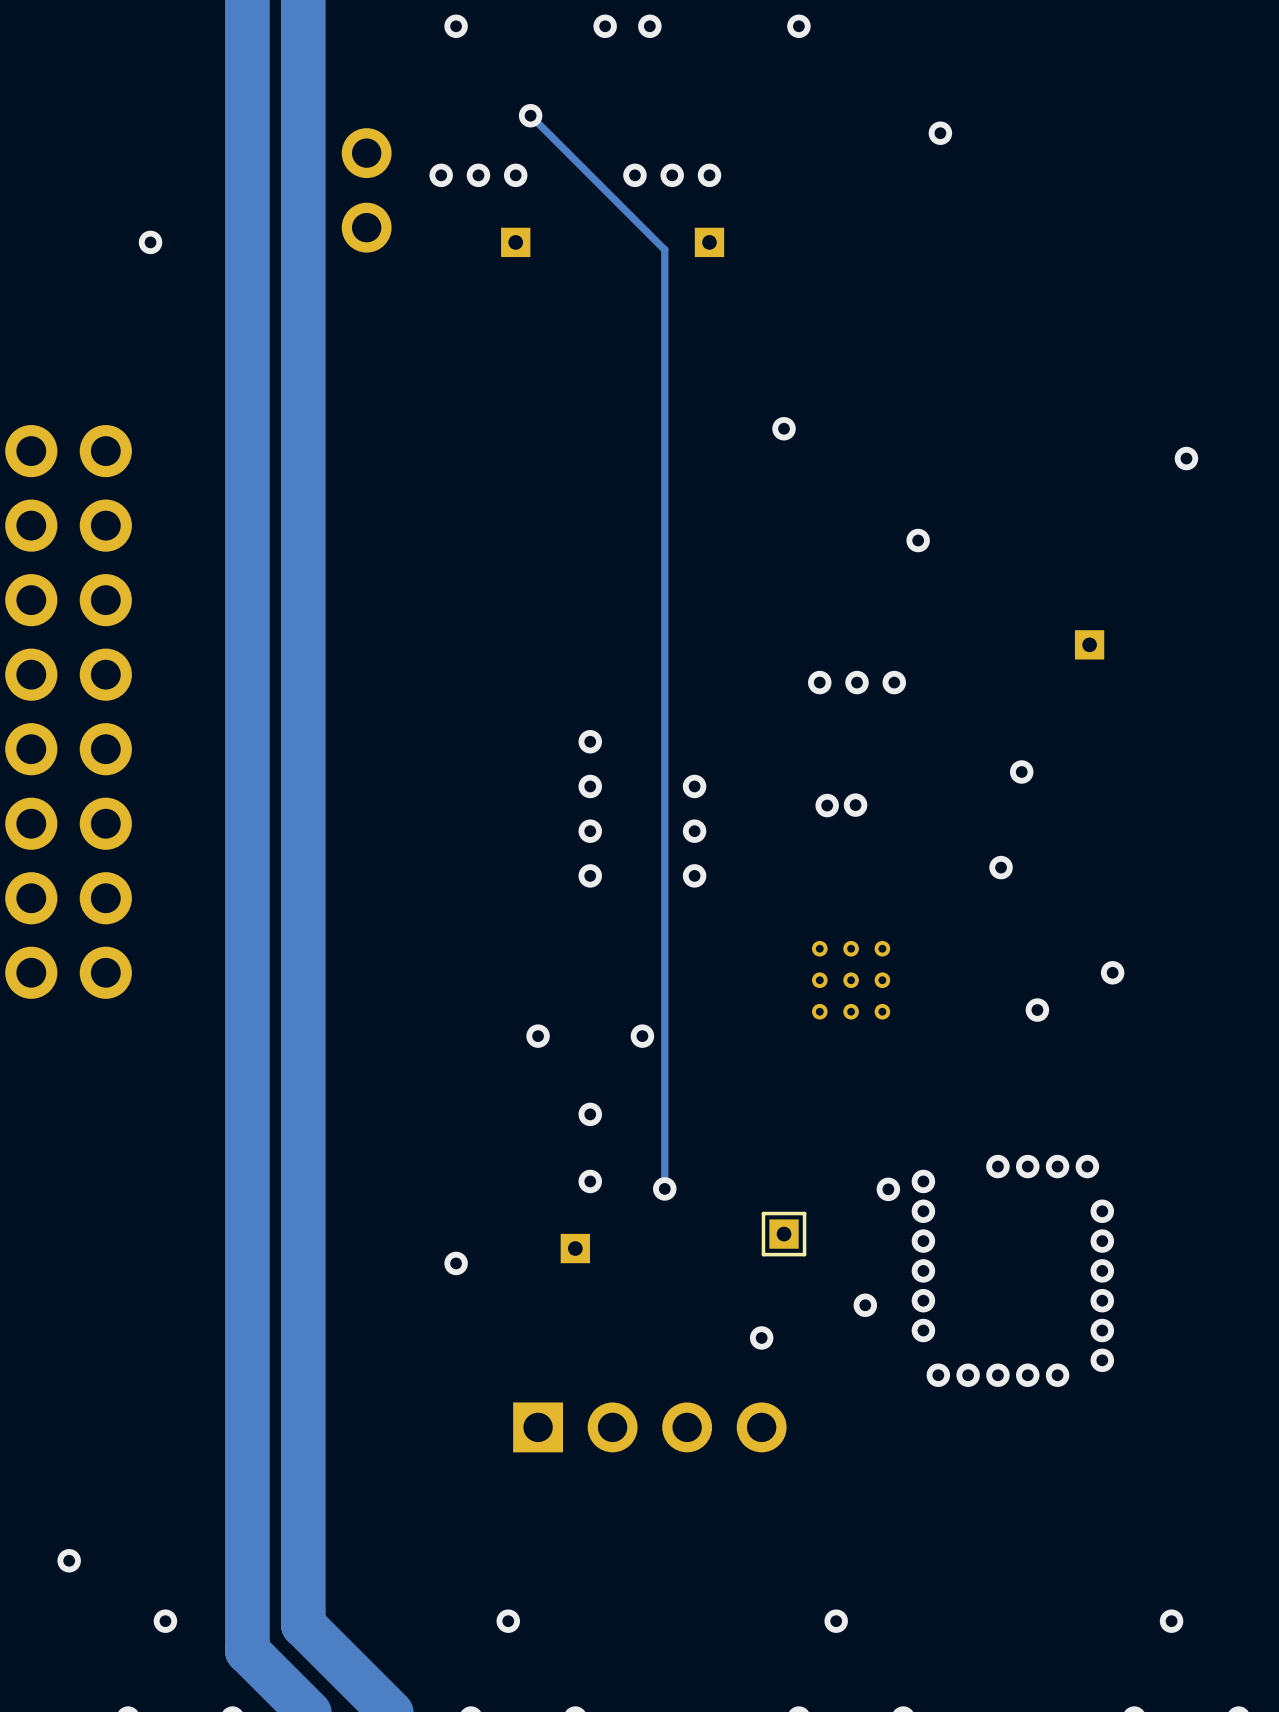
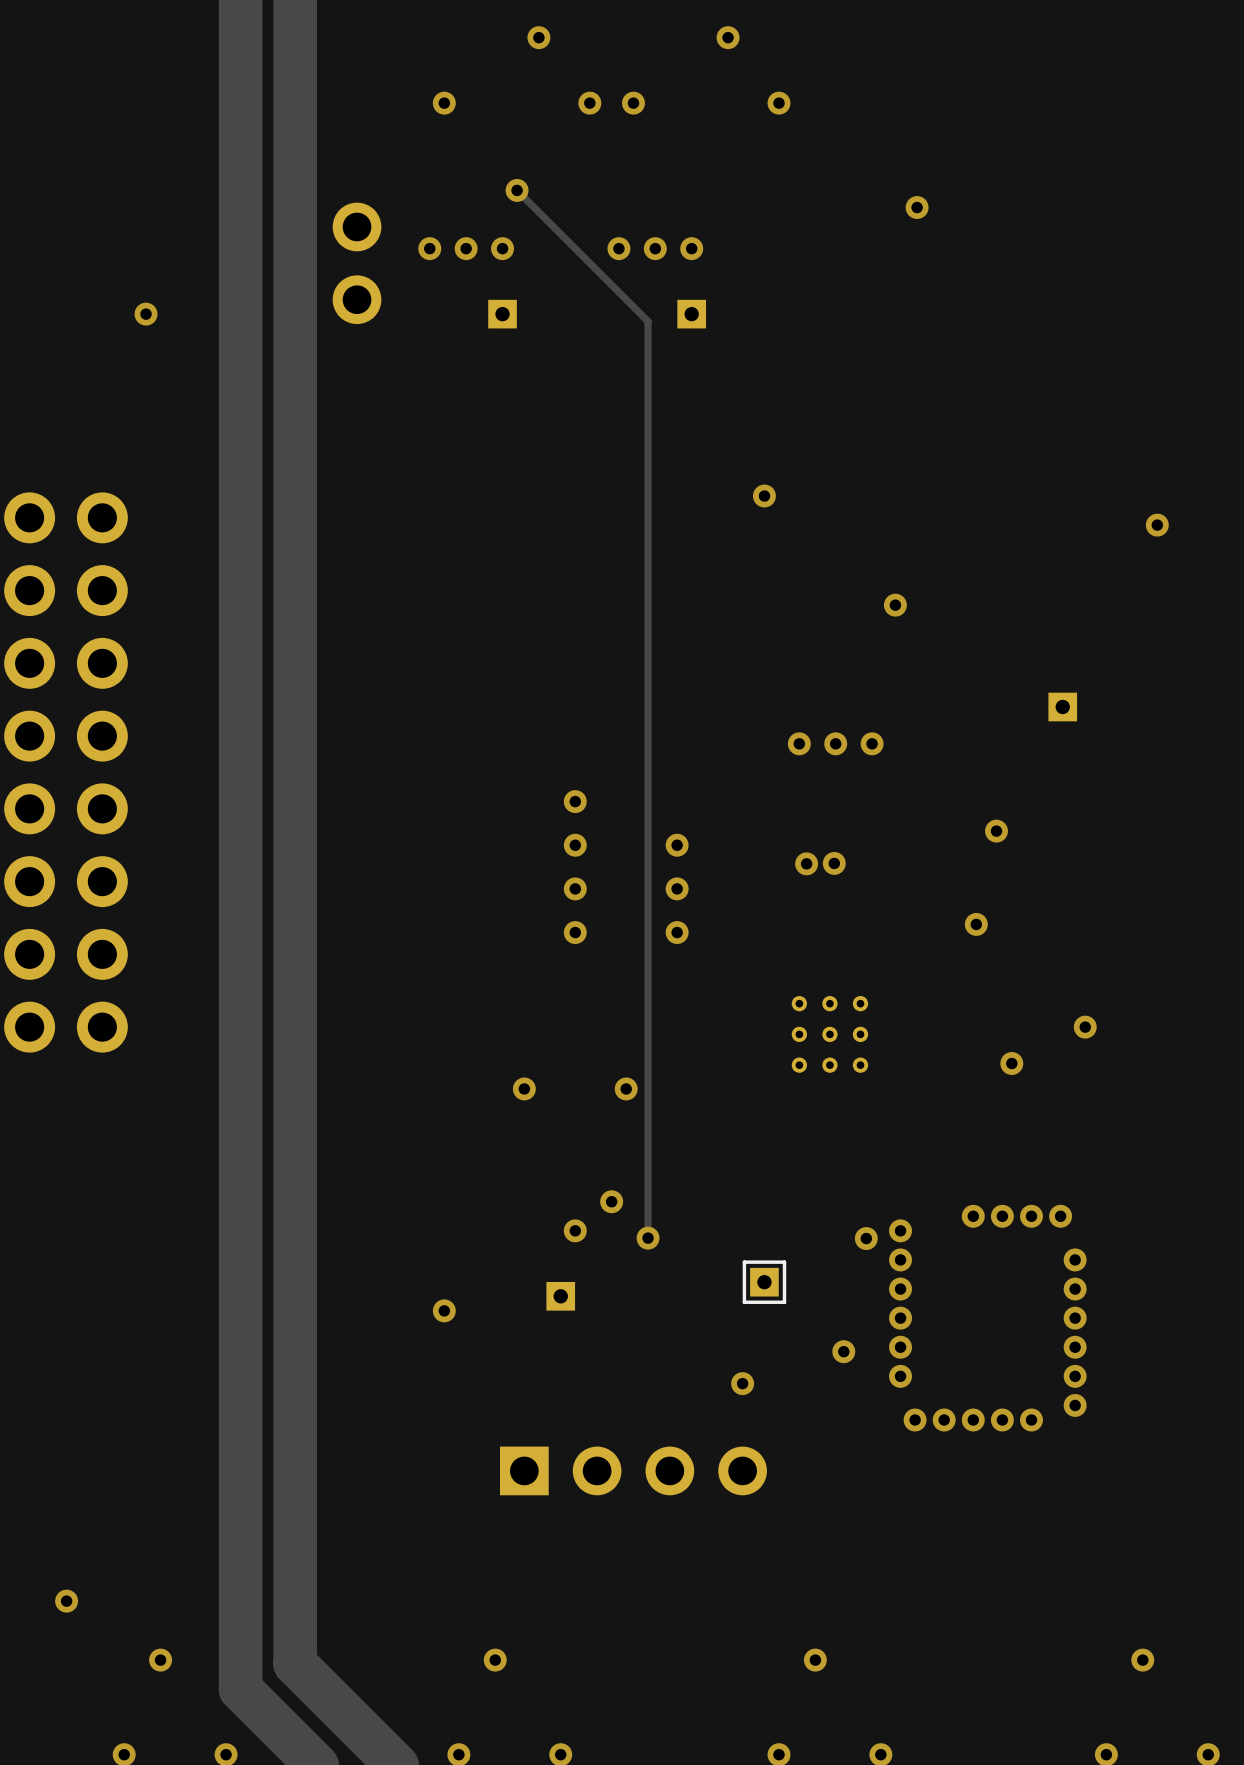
via position: (590, 1114) -> (611, 1201)

